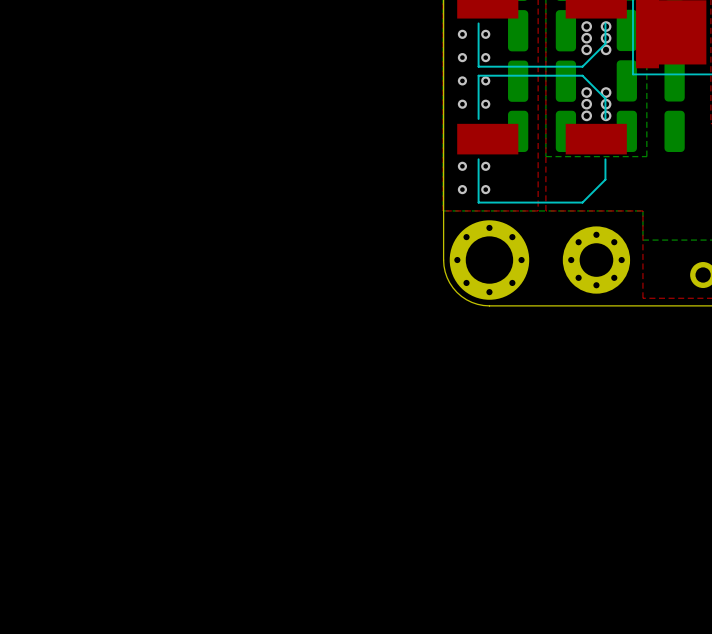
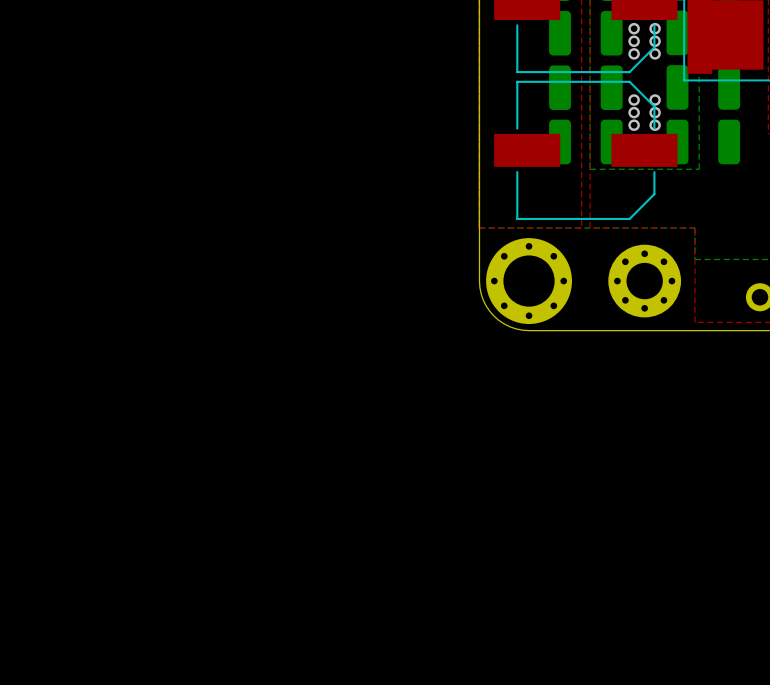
via: (462, 34) -> none
via: (485, 34) -> none
via: (462, 57) -> none
via: (485, 57) -> none
via: (462, 80) -> none
via: (485, 80) -> none
via: (462, 104) -> none
via: (485, 104) -> none
via: (462, 166) -> none
via: (485, 166) -> none
via: (462, 189) -> none
via: (485, 189) -> none

